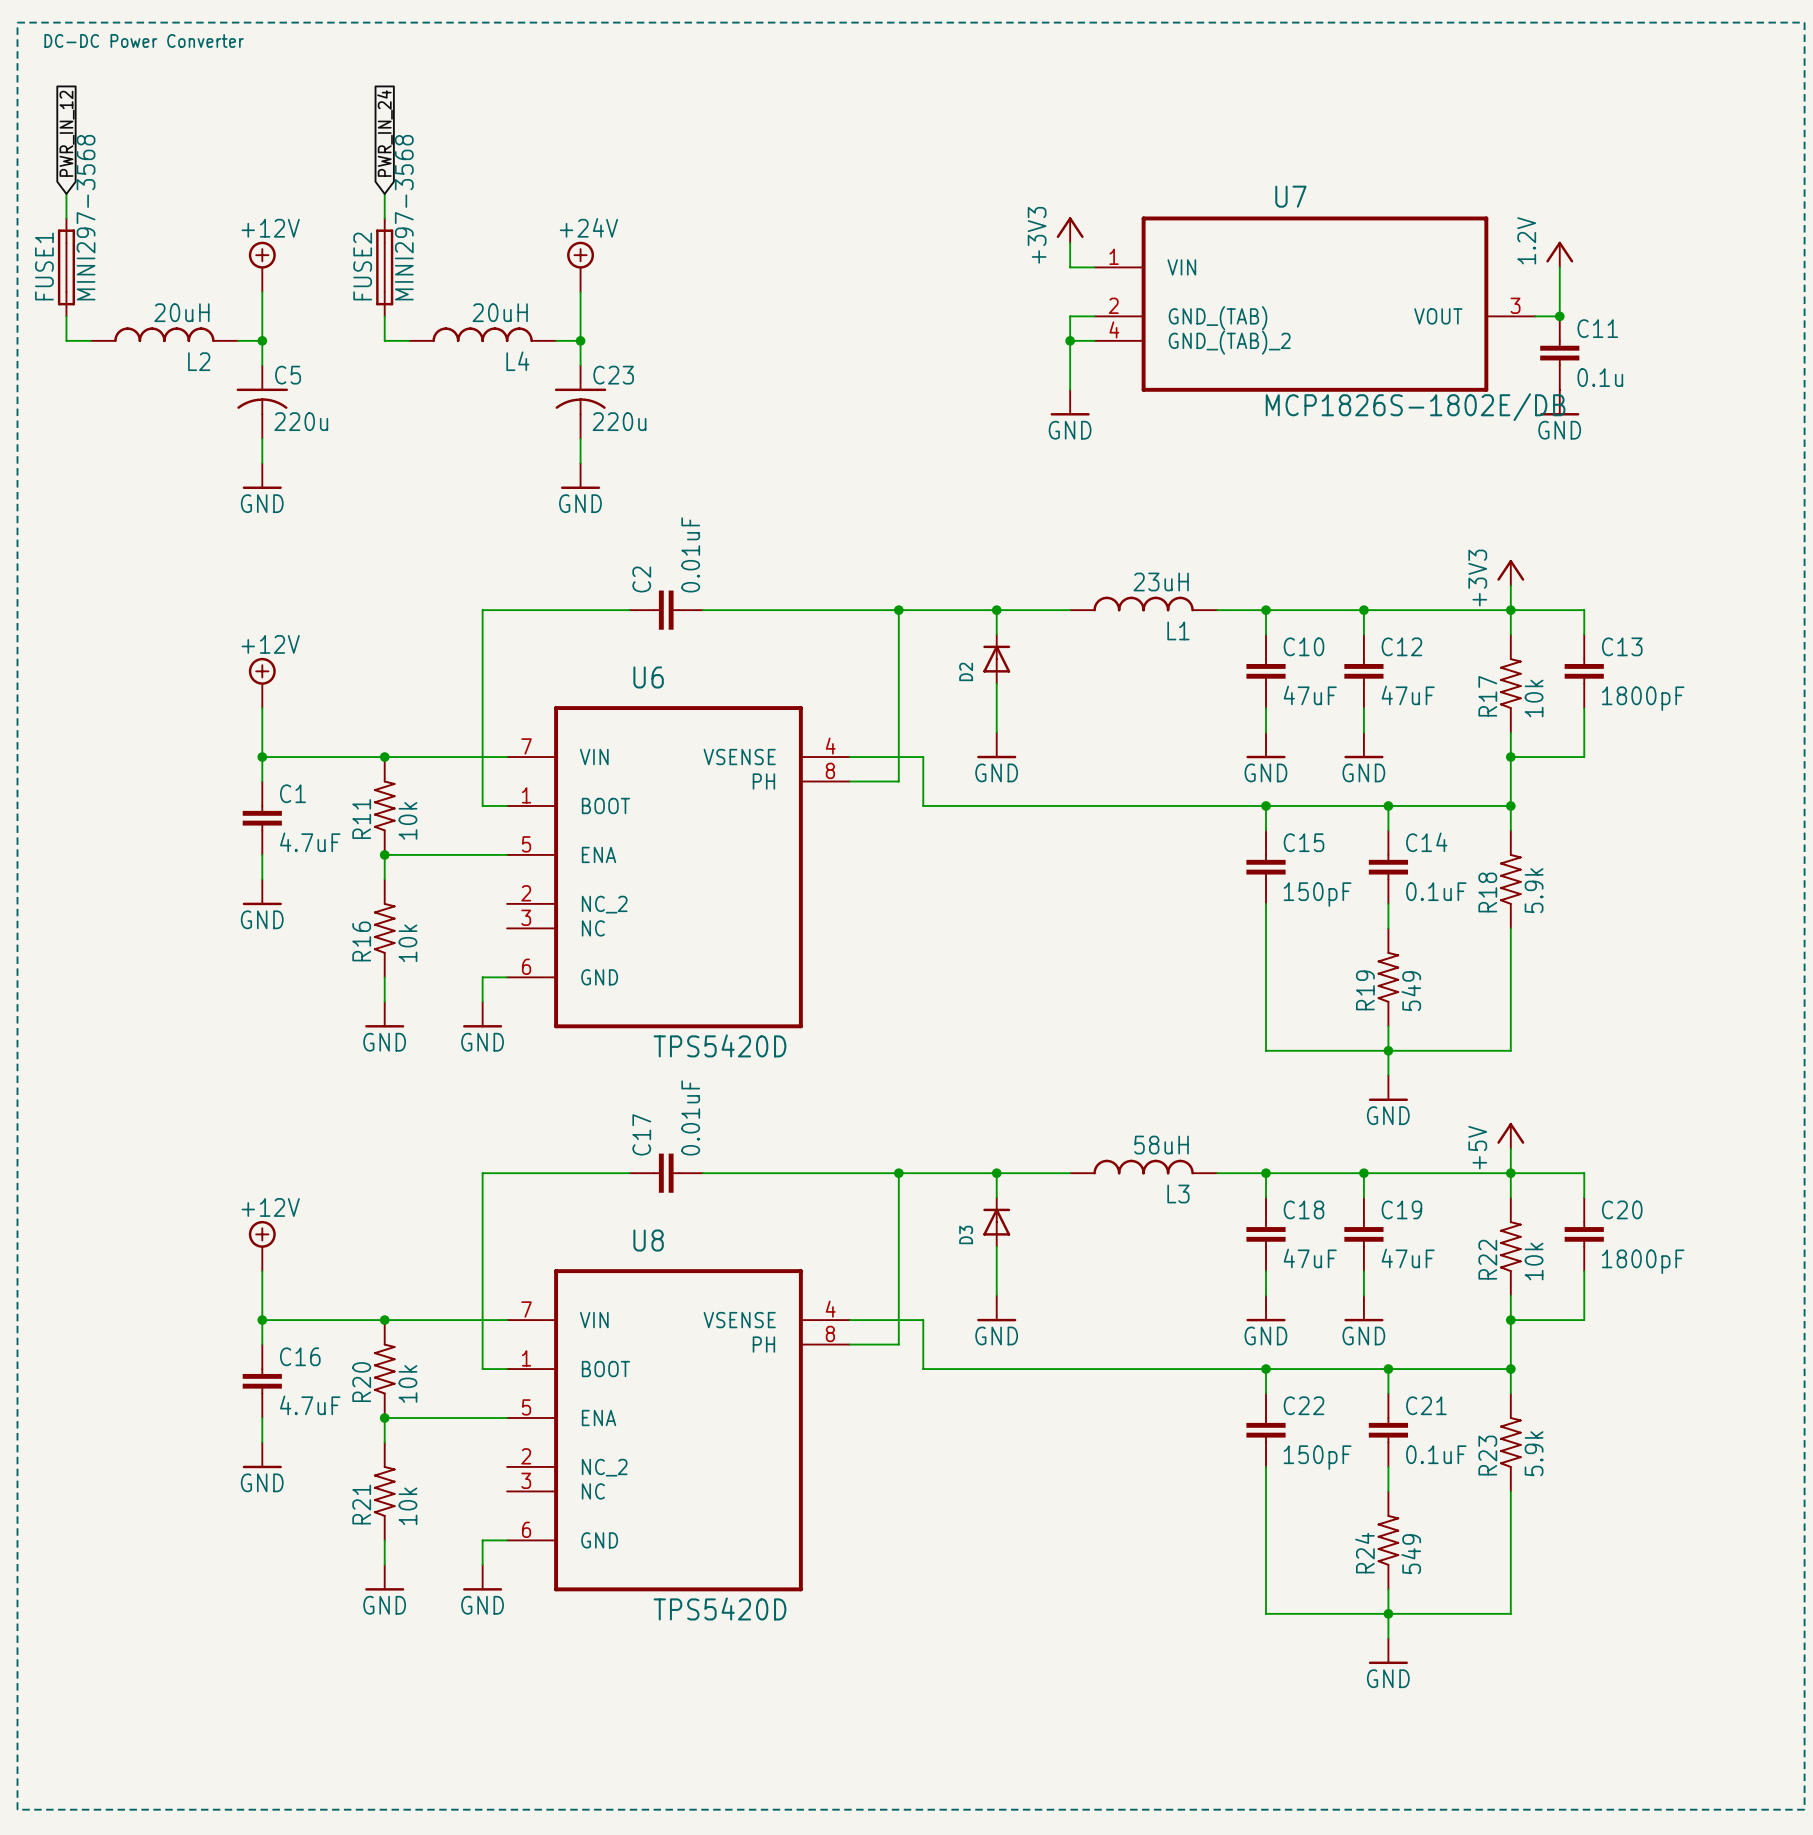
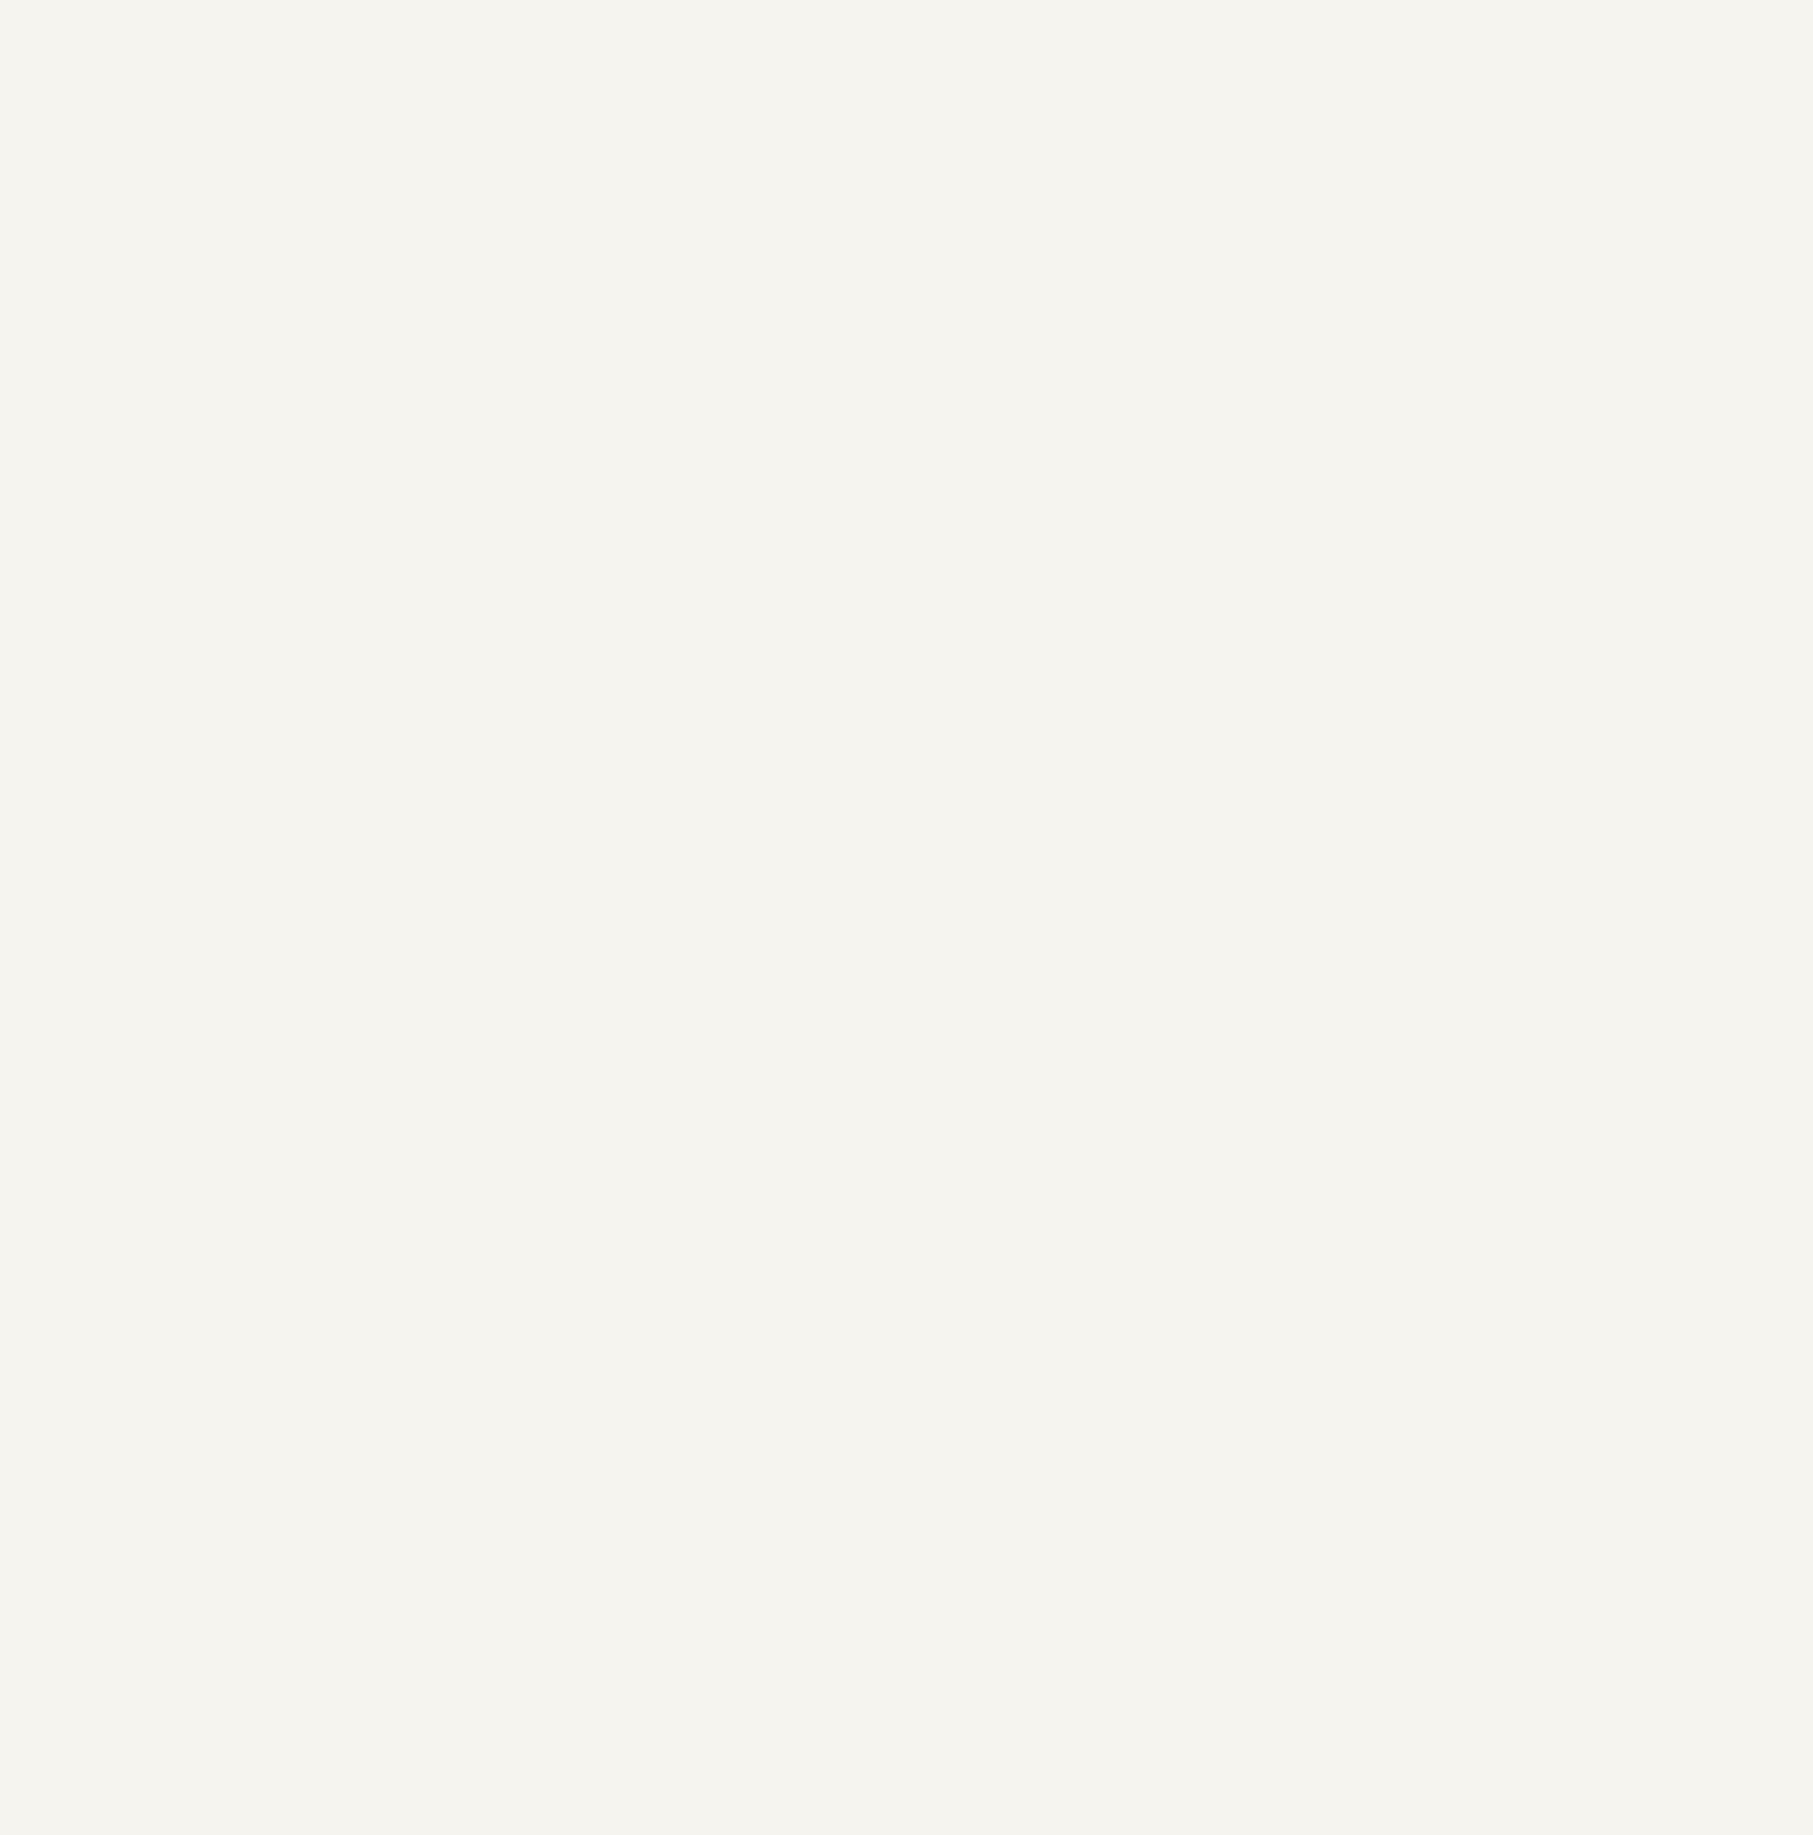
line: (17, 22) (1804, 22) (1804, 1809) (17, 1809) (17, 22) -> none
text: DC-DC Power Converter (144, 40) -> none
global label: PWR_IN_12 (67, 133) -> none
global label: PWR_IN_24 (385, 133) -> none
wire: (66, 193) (66, 218) -> none
wire: (384, 193) (384, 218) -> none
power symbol: +3V3 (1070, 230) -> none
wire: (1070, 242) (1070, 267) (1094, 267) -> none
power symbol: 1.2V (1559, 254) -> none
power symbol: +12V (262, 266) -> none
power symbol: +24V (580, 266) -> none
FUSE1: MINI297-3568 (66, 267) -> none
FUSE2: MINI297-3568 (384, 267) -> none
wire: (1559, 267) (1559, 316) (1535, 316) -> none
wire: (262, 291) (262, 365) -> none
wire: (580, 291) (580, 365) -> none
U7: MCP1826S-1802E/DB (1314, 304) -> none
wire: (66, 316) (66, 340) (90, 340) -> none
wire: (384, 316) (384, 340) (409, 340) -> none
wire: (1094, 316) (1070, 316) (1070, 389) -> none
junction: (1559, 316) -> none
L2: 20uH (164, 334) -> none
L4: 20uH (482, 334) -> none
wire: (237, 340) (262, 340) -> none
junction: (262, 340) -> none
wire: (556, 340) (580, 340) -> none
junction: (580, 340) -> none
wire: (1070, 340) (1094, 340) -> none
junction: (1070, 340) -> none
C11: 0.1u (1559, 353) -> none
C5: 220u (262, 402) -> none
C23: 220u (580, 402) -> none
power symbol: GND (1070, 402) -> none
power symbol: GND (1559, 402) -> none
wire: (262, 438) (262, 463) -> none
wire: (580, 438) (580, 463) -> none
power symbol: GND (262, 476) -> none
power symbol: GND (580, 476) -> none
power symbol: +3V3 (1510, 572) -> none
wire: (1510, 585) (1510, 634) -> none
L1: 23uH (1143, 604) -> none
wire: (629, 610) (482, 610) (482, 805) (507, 805) -> none
C2: 0.01uF (666, 610) -> none
wire: (702, 610) (1070, 610) -> none
wire: (898, 610) (898, 781) (849, 781) -> none
junction: (898, 610) -> none
wire: (996, 610) (996, 634) -> none
junction: (996, 610) -> none
wire: (1217, 610) (1584, 610) (1584, 634) -> none
wire: (1266, 610) (1266, 634) -> none
junction: (1266, 610) -> none
wire: (1363, 610) (1363, 634) -> none
junction: (1363, 610) -> none
junction: (1510, 610) -> none
D2: (996, 659) -> none
C10: 47uF (1266, 671) -> none
C12: 47uF (1363, 671) -> none
C13: 1800pF (1584, 671) -> none
power symbol: +12V (262, 682) -> none
wire: (996, 683) (996, 732) -> none
R17: 10k (1510, 683) -> none
wire: (262, 708) (262, 781) -> none
wire: (1266, 708) (1266, 732) -> none
wire: (1363, 708) (1363, 732) -> none
wire: (1584, 708) (1584, 757) (1510, 757) -> none
wire: (1510, 732) (1510, 830) -> none
power symbol: GND (996, 745) -> none
power symbol: GND (1266, 745) -> none
power symbol: GND (1363, 745) -> none
wire: (262, 757) (507, 757) -> none
junction: (262, 757) -> none
junction: (384, 757) -> none
wire: (849, 757) (923, 757) (923, 805) (1510, 805) -> none
junction: (1510, 757) -> none
R11: 10k (384, 805) -> none
wire: (1266, 805) (1266, 830) -> none
junction: (1266, 805) -> none
wire: (1388, 805) (1388, 830) -> none
junction: (1388, 805) -> none
junction: (1510, 805) -> none
C1: 4.7uF (262, 818) -> none
wire: (262, 854) (262, 879) -> none
junction: (384, 854) -> none
wire: (507, 854) (384, 854) (384, 879) -> none
U6: TPS5420D (678, 867) -> none
C15: 150pF (1266, 867) -> none
C14: 0.1uF (1388, 867) -> none
R18: 5.9k (1510, 879) -> none
power symbol: GND (262, 892) -> none
wire: (1266, 903) (1266, 1050) (1510, 1050) (1510, 928) -> none
wire: (1388, 903) (1388, 928) -> none
R16: 10k (384, 928) -> none
wire: (384, 977) (384, 1001) -> none
wire: (507, 977) (482, 977) (482, 1001) -> none
R19: 549 (1388, 977) -> none
power symbol: GND (384, 1014) -> none
power symbol: GND (482, 1014) -> none
wire: (1388, 1026) (1388, 1075) -> none
junction: (1388, 1050) -> none
power symbol: GND (1388, 1088) -> none
power symbol: +5V (1510, 1135) -> none
wire: (1510, 1148) (1510, 1197) -> none
L3: 58uH (1143, 1167) -> none
wire: (629, 1173) (482, 1173) (482, 1369) (507, 1369) -> none
C17: 0.01uF (666, 1173) -> none
wire: (702, 1173) (1070, 1173) -> none
wire: (898, 1173) (898, 1344) (849, 1344) -> none
junction: (898, 1173) -> none
wire: (996, 1173) (996, 1197) -> none
junction: (996, 1173) -> none
wire: (1217, 1173) (1584, 1173) (1584, 1197) -> none
wire: (1266, 1173) (1266, 1197) -> none
junction: (1266, 1173) -> none
wire: (1363, 1173) (1363, 1197) -> none
junction: (1363, 1173) -> none
junction: (1510, 1173) -> none
D3: (996, 1222) -> none
C18: 47uF (1266, 1234) -> none
C19: 47uF (1363, 1234) -> none
C20: 1800pF (1584, 1234) -> none
power symbol: +12V (262, 1246) -> none
wire: (996, 1246) (996, 1295) -> none
R22: 10k (1510, 1246) -> none
wire: (262, 1271) (262, 1344) -> none
wire: (1266, 1271) (1266, 1295) -> none
wire: (1363, 1271) (1363, 1295) -> none
wire: (1584, 1271) (1584, 1320) (1510, 1320) -> none
wire: (1510, 1295) (1510, 1393) -> none
power symbol: GND (996, 1308) -> none
power symbol: GND (1266, 1308) -> none
power symbol: GND (1363, 1308) -> none
wire: (262, 1320) (507, 1320) -> none
junction: (262, 1320) -> none
junction: (384, 1320) -> none
wire: (849, 1320) (923, 1320) (923, 1369) (1510, 1369) -> none
junction: (1510, 1320) -> none
R20: 10k (384, 1369) -> none
wire: (1266, 1369) (1266, 1393) -> none
junction: (1266, 1369) -> none
wire: (1388, 1369) (1388, 1393) -> none
junction: (1388, 1369) -> none
junction: (1510, 1369) -> none
C16: 4.7uF (262, 1381) -> none
wire: (262, 1418) (262, 1442) -> none
junction: (384, 1418) -> none
wire: (507, 1418) (384, 1418) (384, 1442) -> none
U8: TPS5420D (678, 1430) -> none
C22: 150pF (1266, 1430) -> none
C21: 0.1uF (1388, 1430) -> none
R23: 5.9k (1510, 1442) -> none
power symbol: GND (262, 1455) -> none
wire: (1266, 1466) (1266, 1613) (1510, 1613) (1510, 1491) -> none
wire: (1388, 1466) (1388, 1491) -> none
R21: 10k (384, 1491) -> none
wire: (384, 1540) (384, 1564) -> none
wire: (507, 1540) (482, 1540) (482, 1564) -> none
R24: 549 (1388, 1540) -> none
power symbol: GND (384, 1577) -> none
power symbol: GND (482, 1577) -> none
wire: (1388, 1589) (1388, 1638) -> none
junction: (1388, 1613) -> none
power symbol: GND (1388, 1651) -> none

